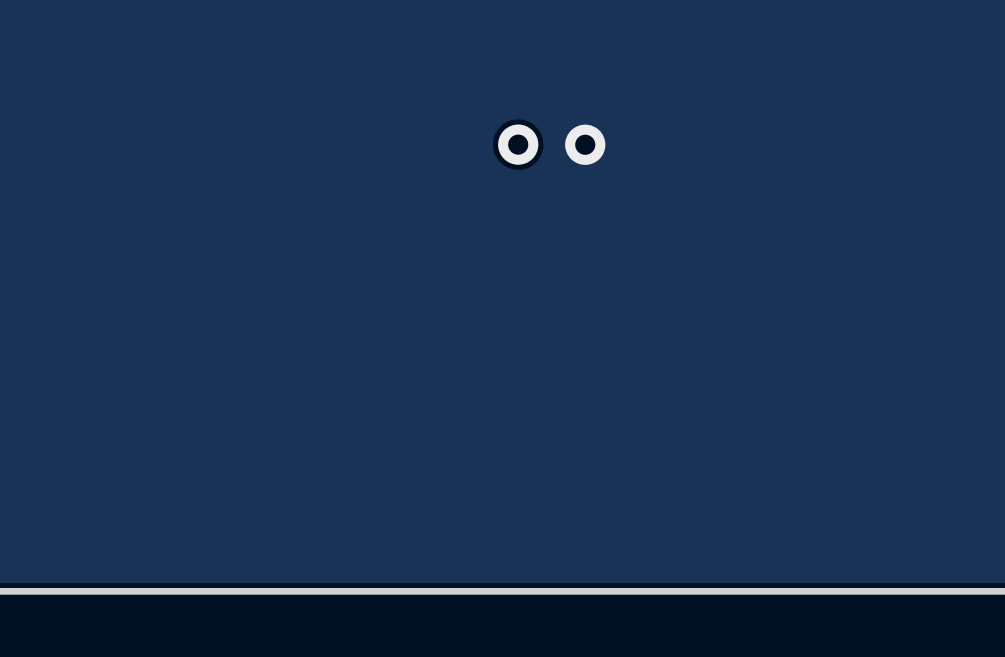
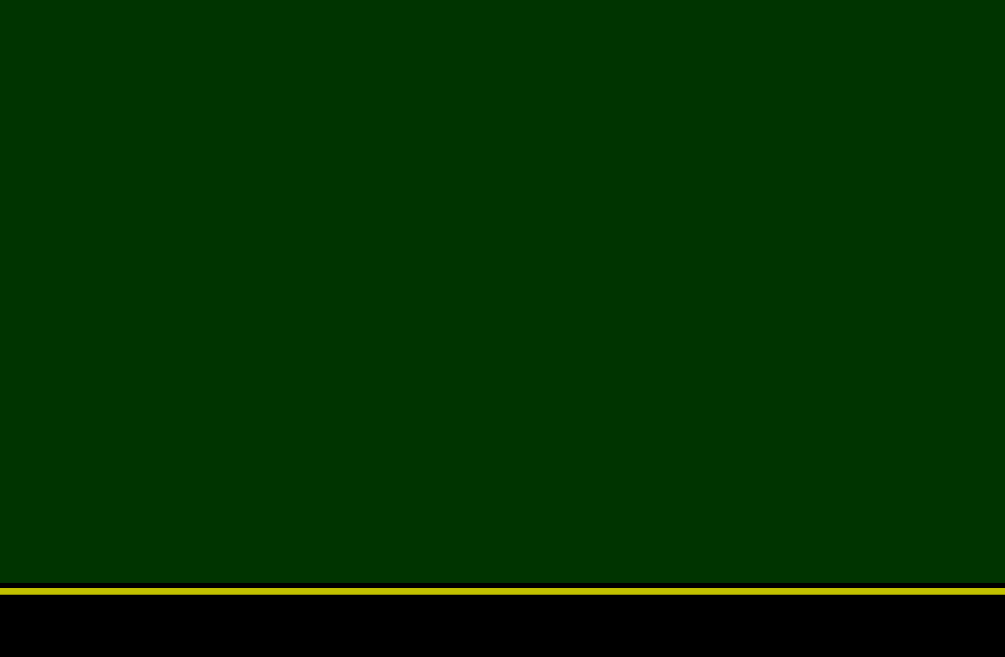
via: (518, 144) -> none
via: (585, 144) -> none

